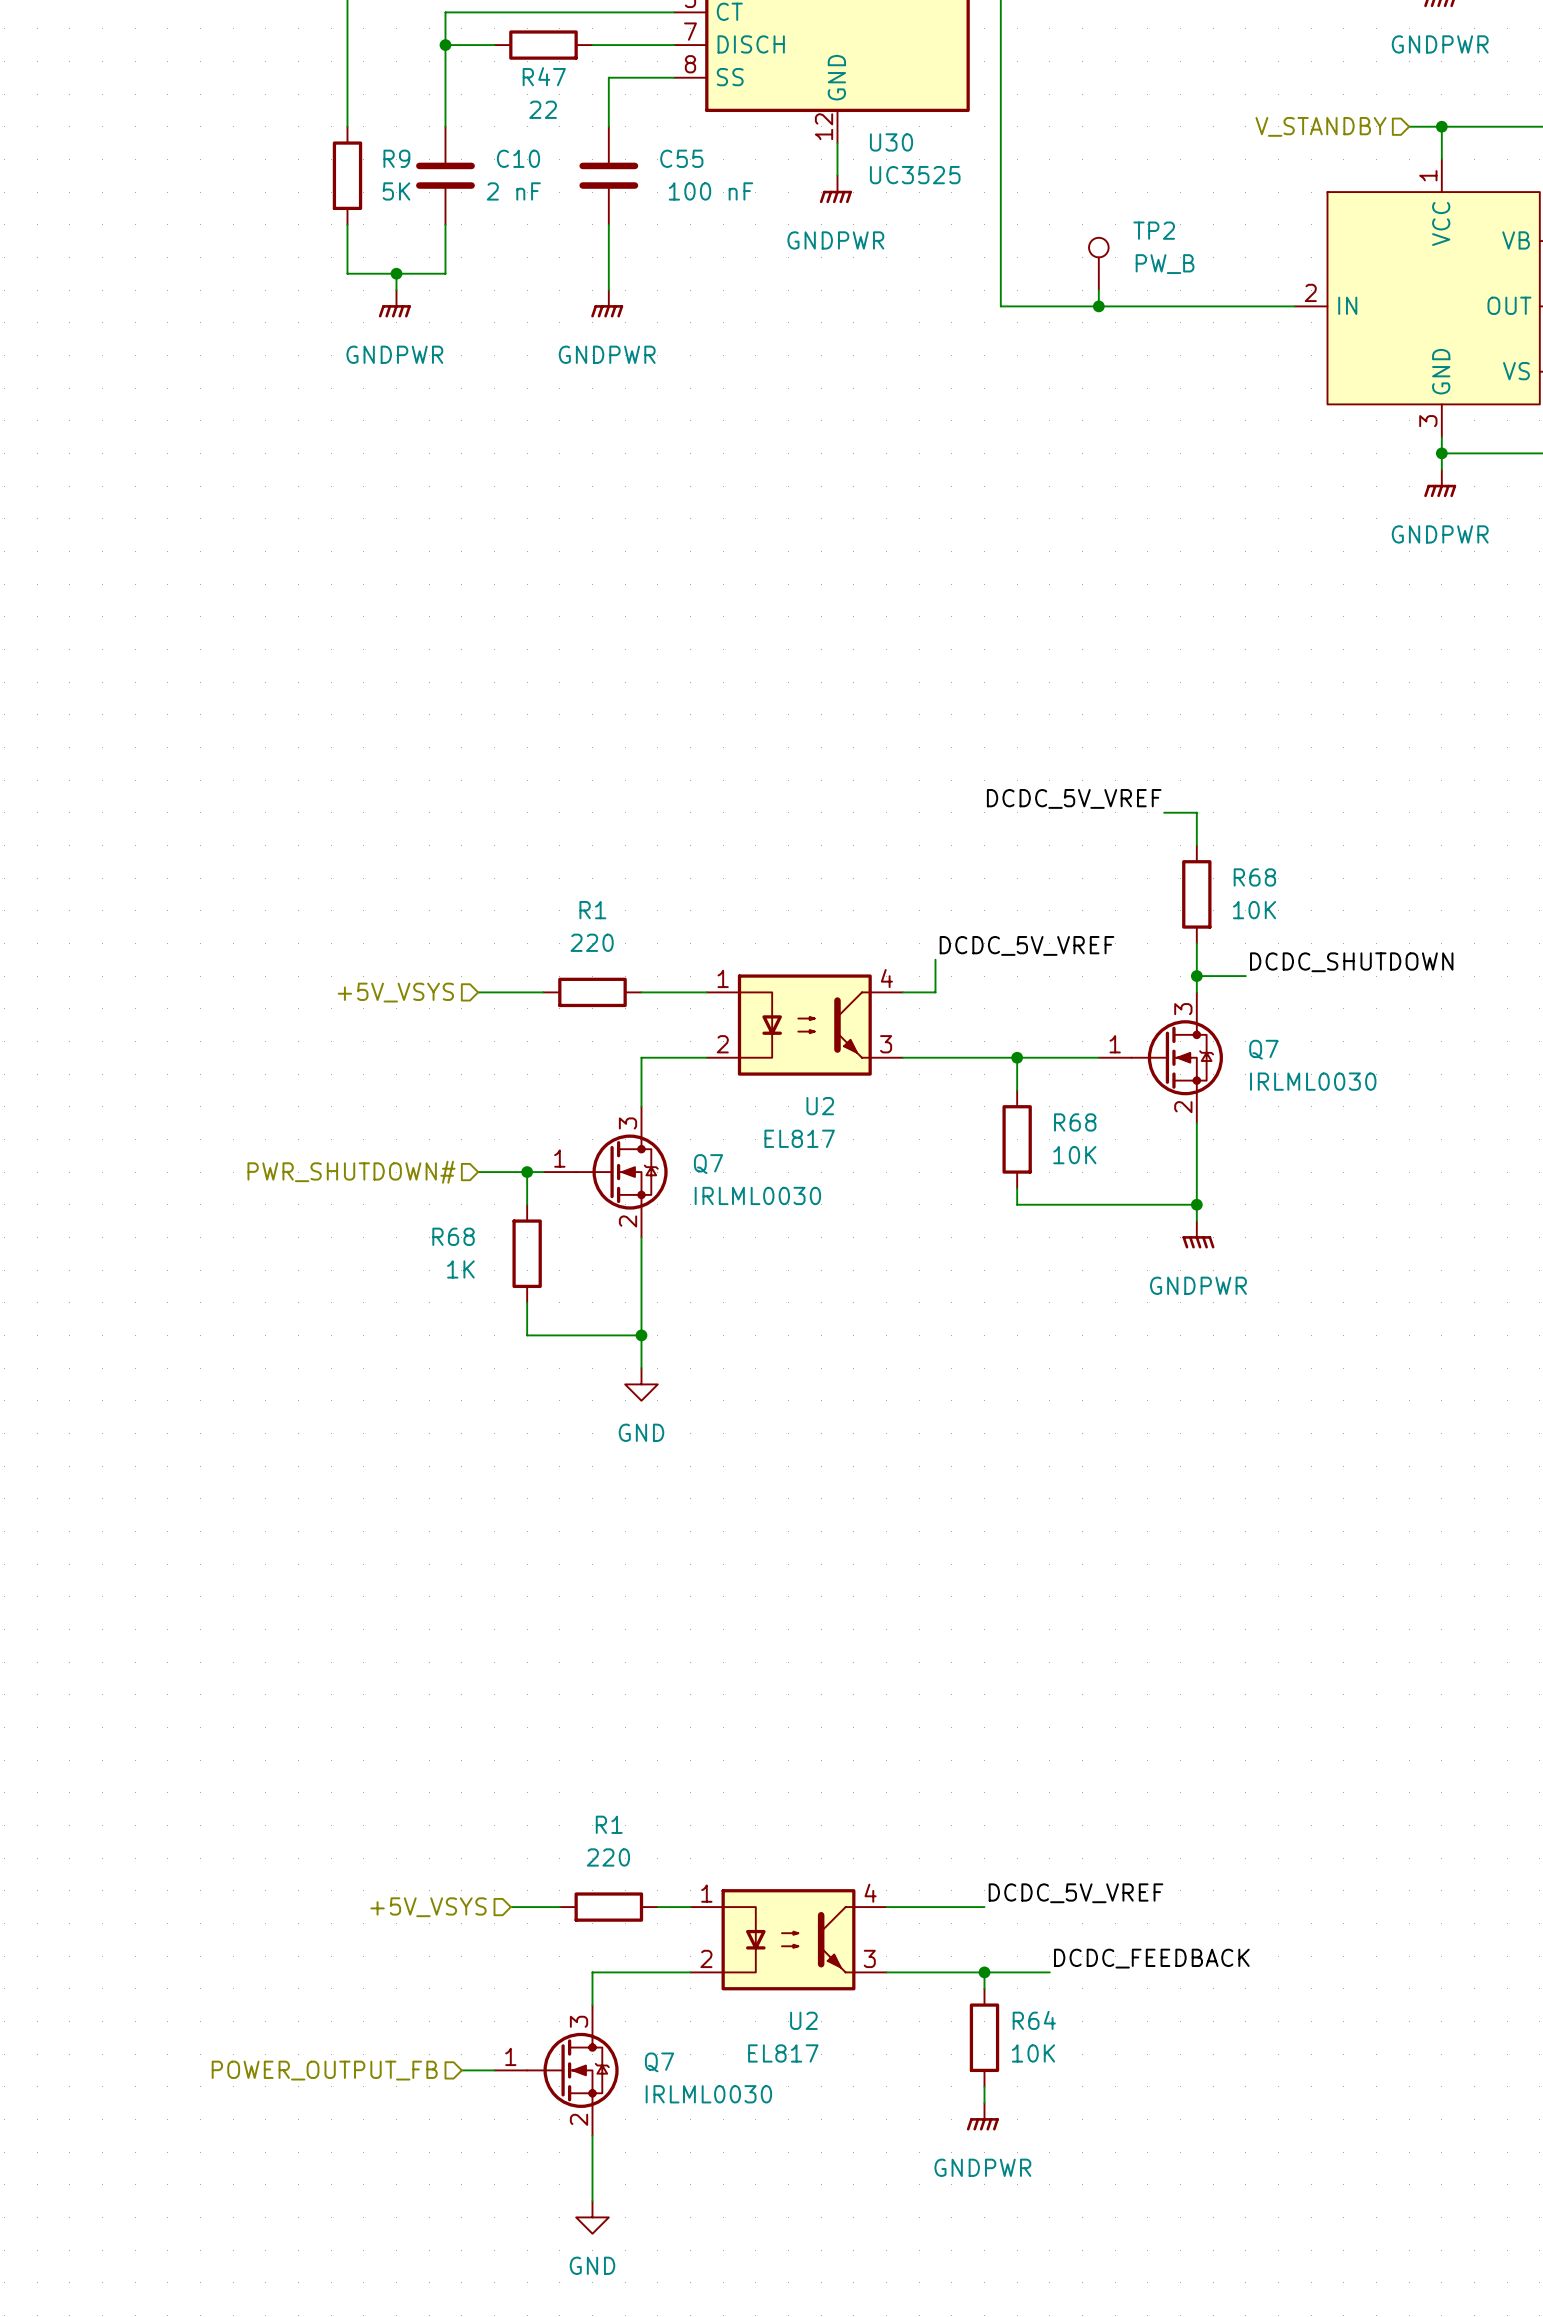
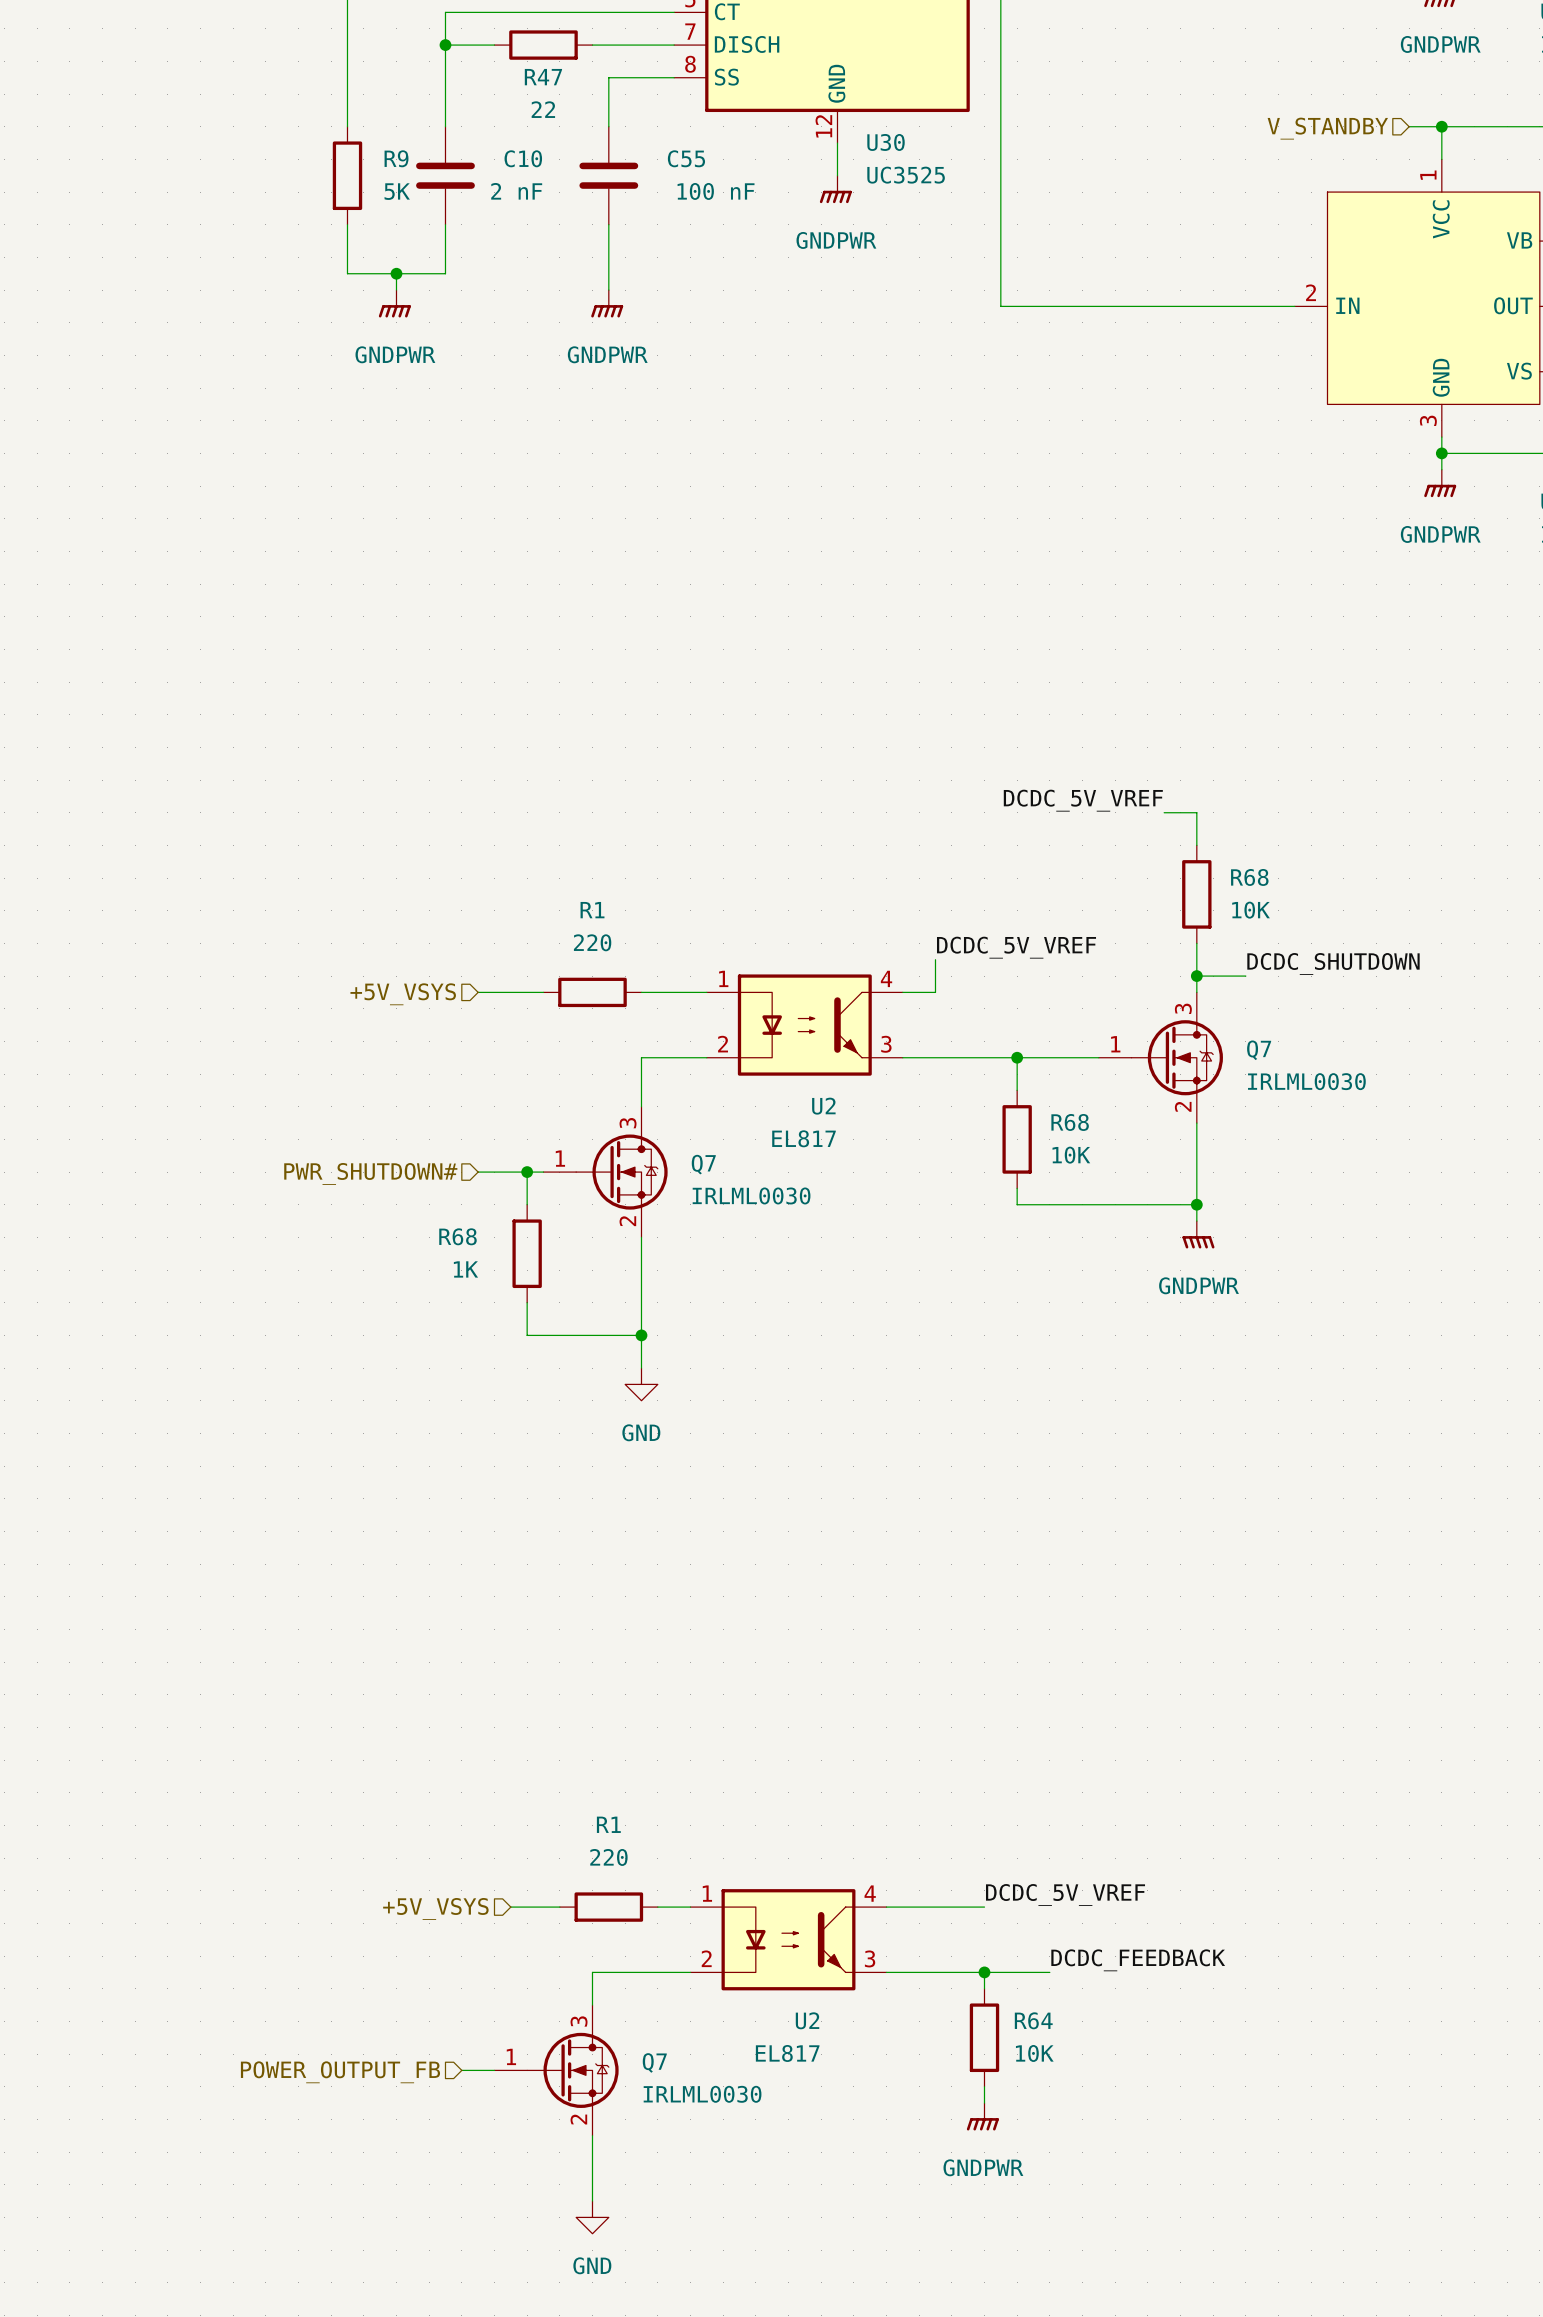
TP2: PW_B (1098, 263) -> none
wire: (1098, 290) (1098, 306) -> none
junction: (1098, 306) -> none

